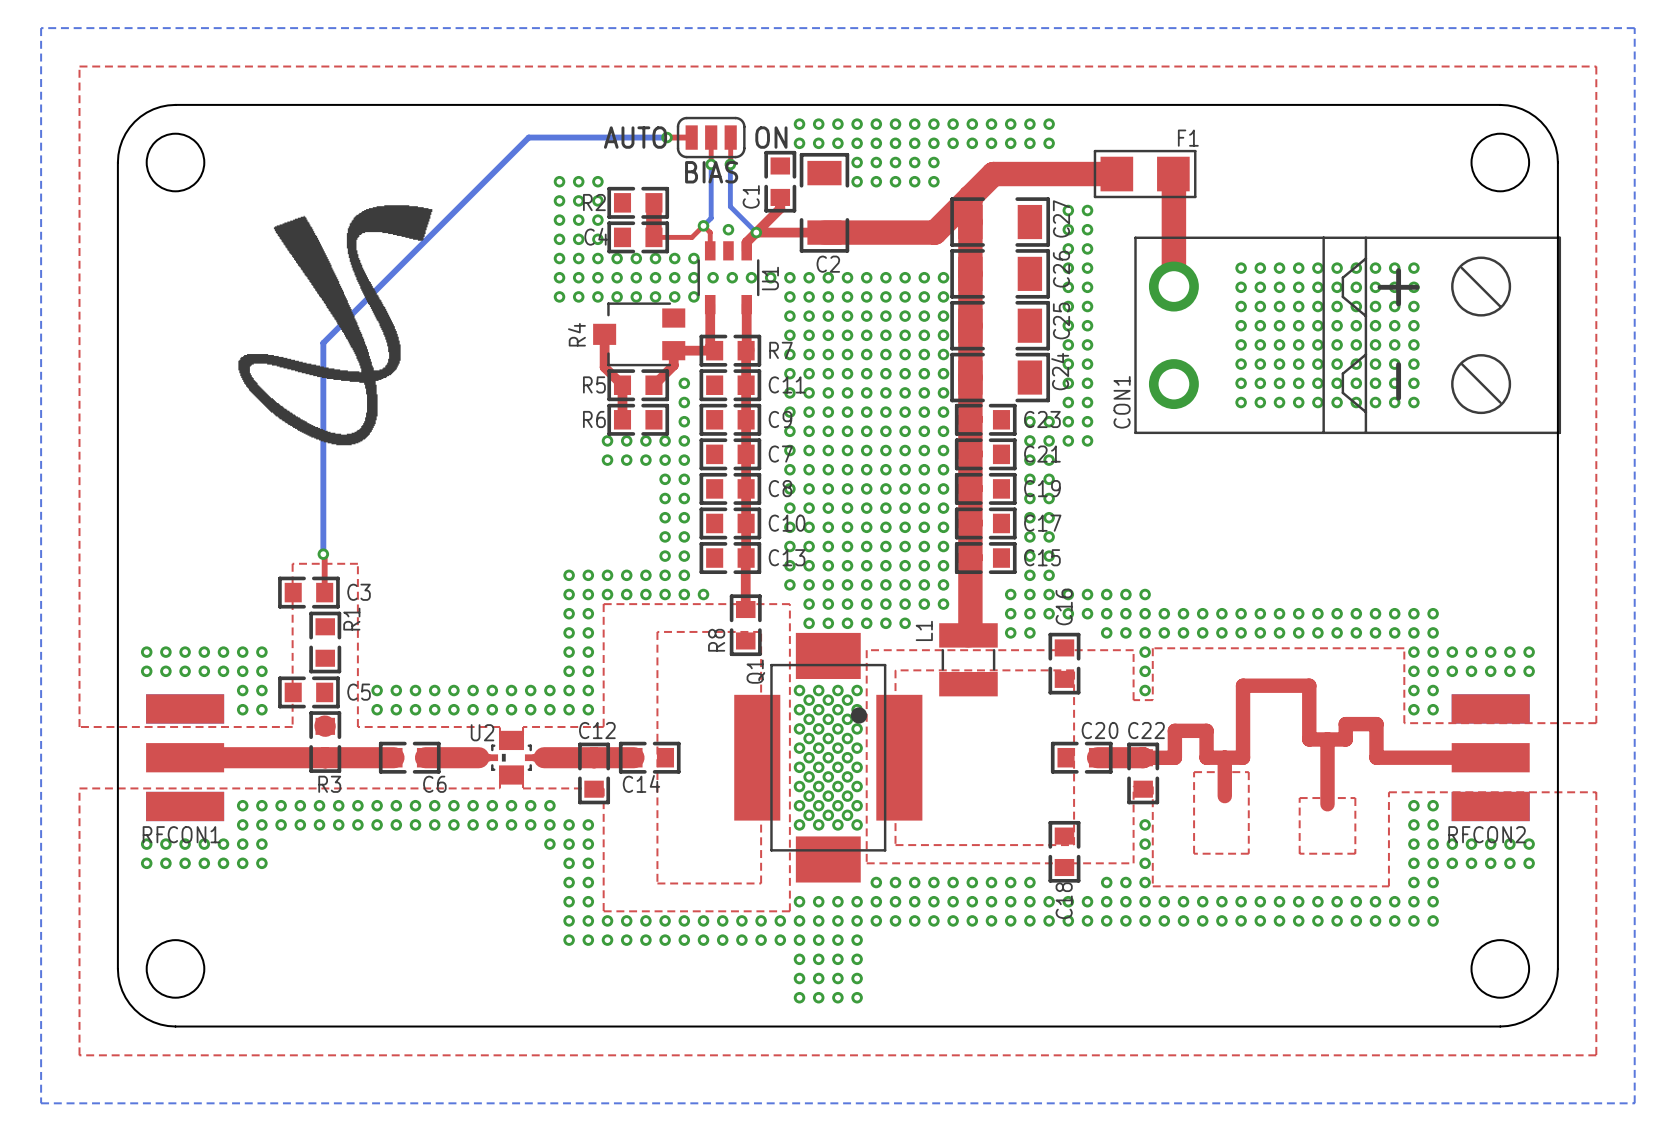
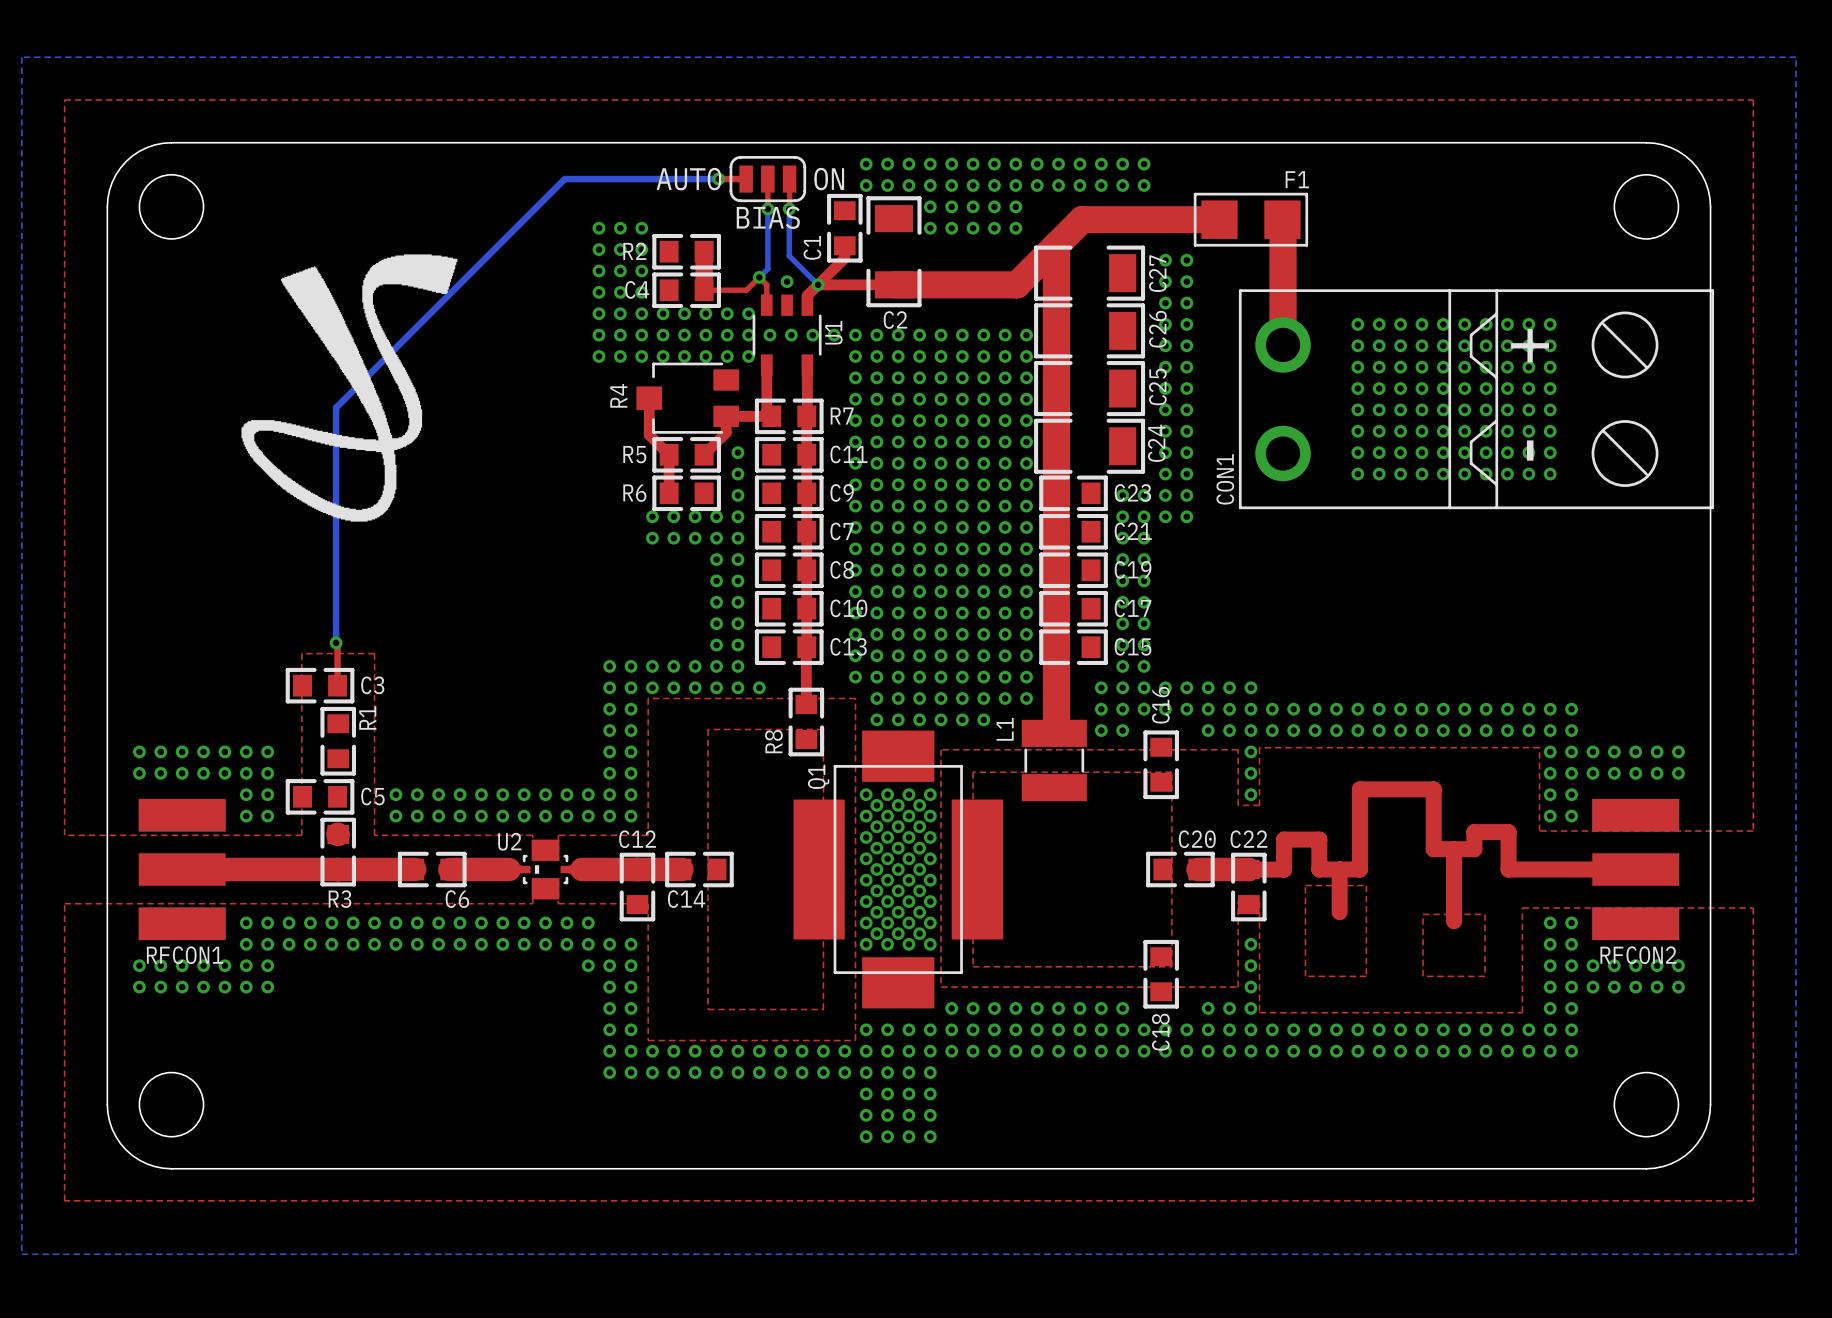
Q1 footprint: [734, 632, 923, 883] -> [793, 730, 1003, 1009]

